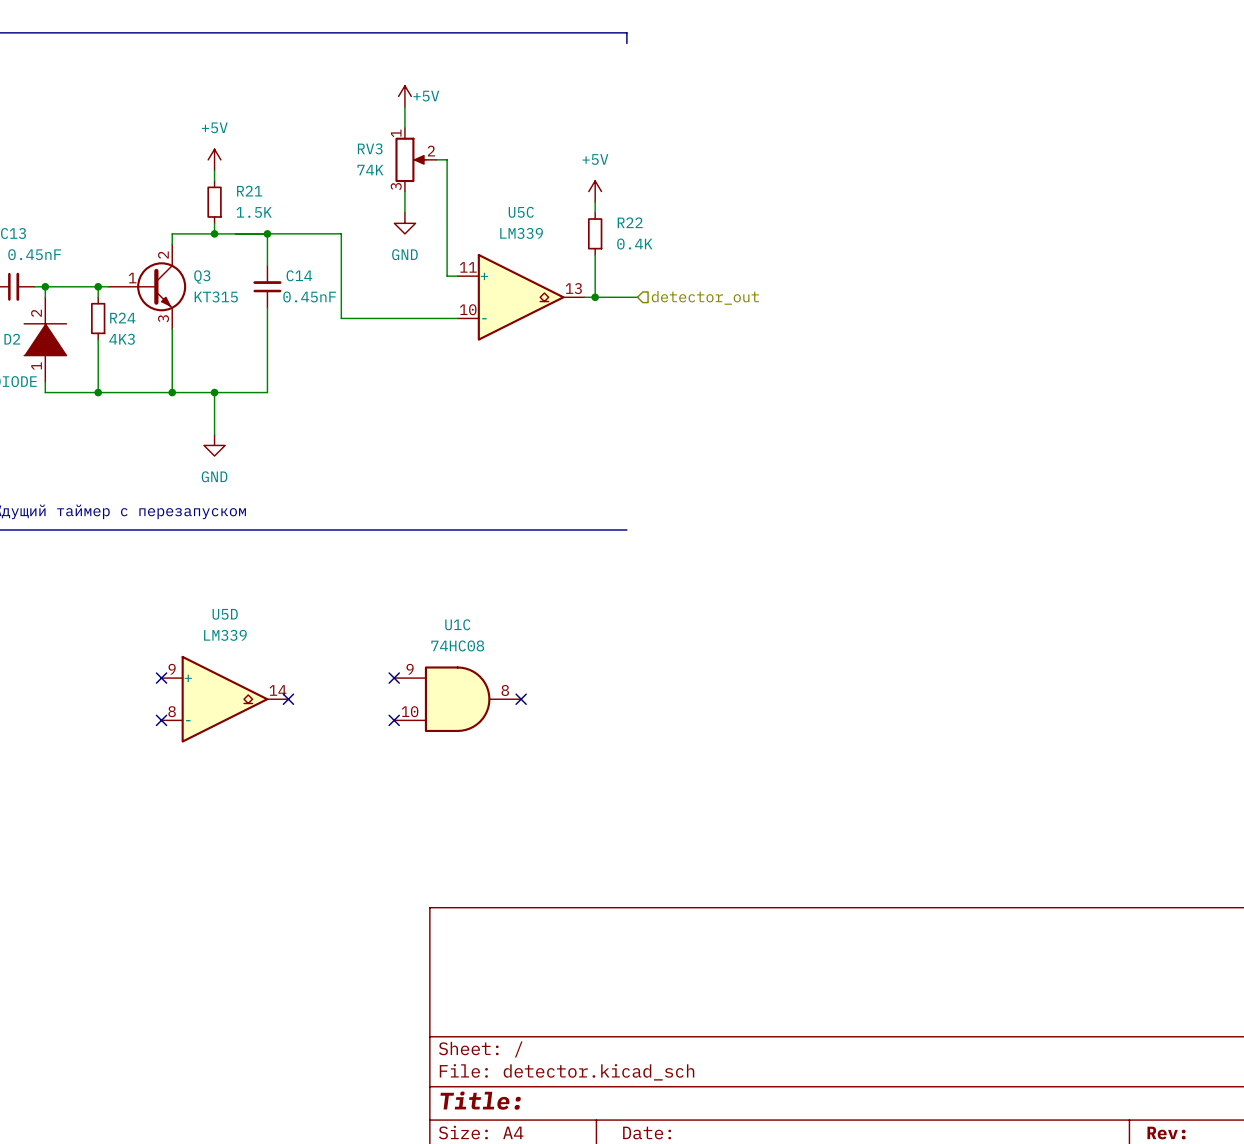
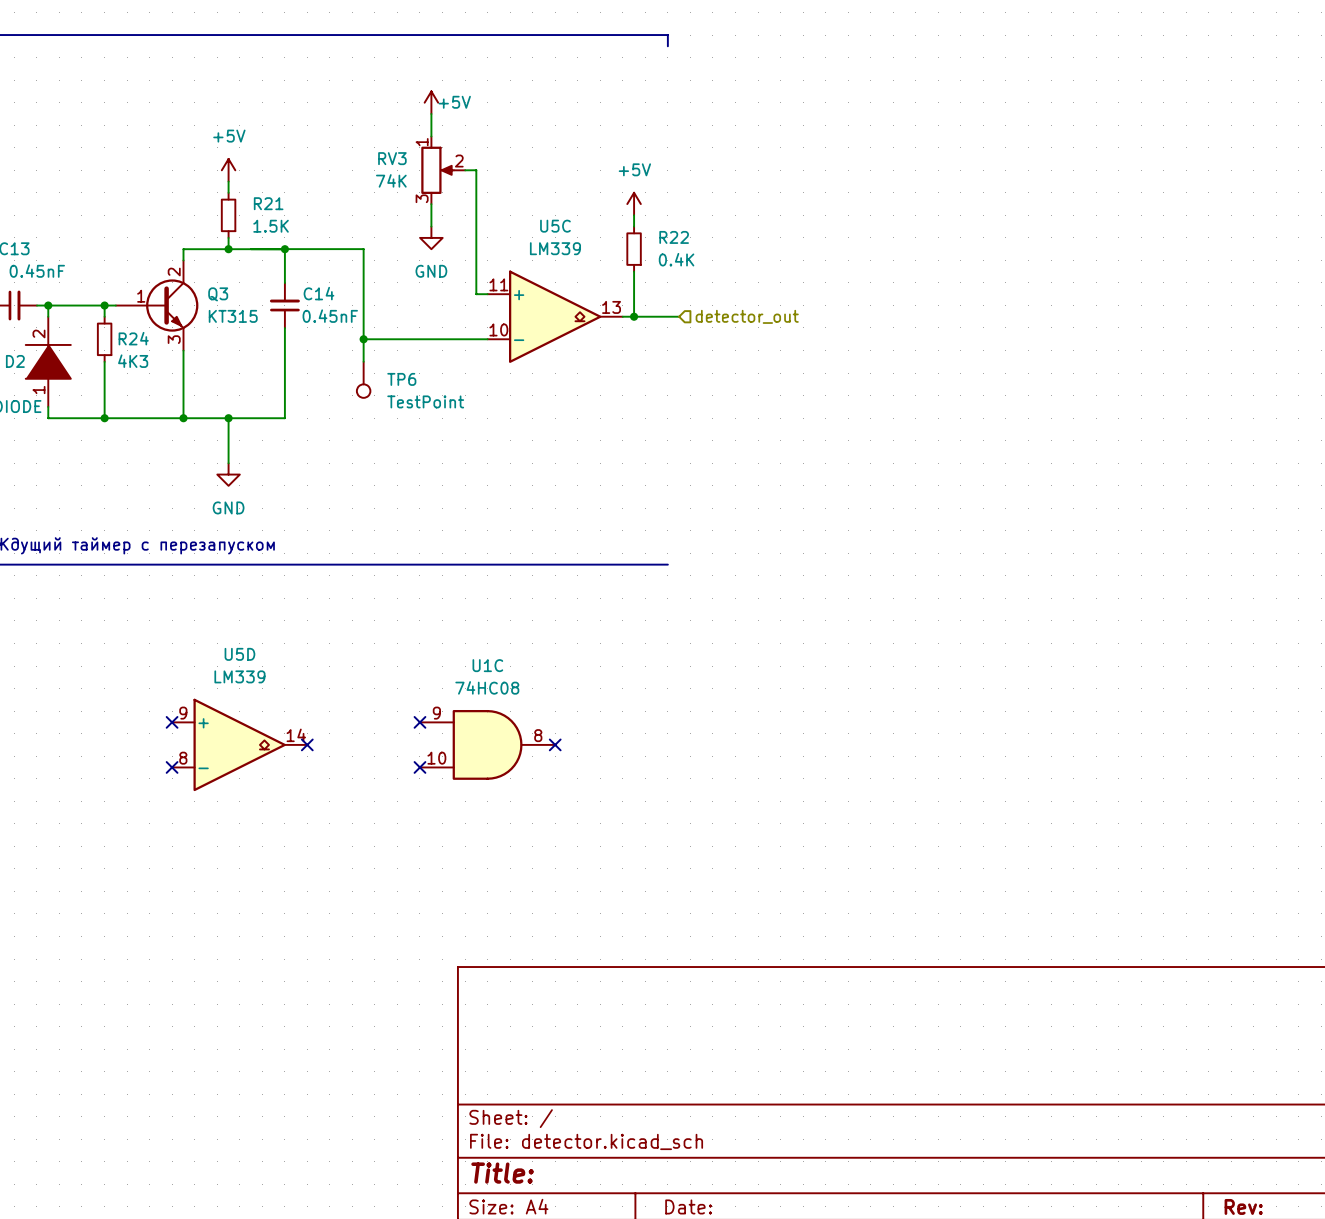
wire: none -> (363, 339) (363, 361)
junction: none -> (363, 339)
TP6: none -> TestPoint (363, 379)

